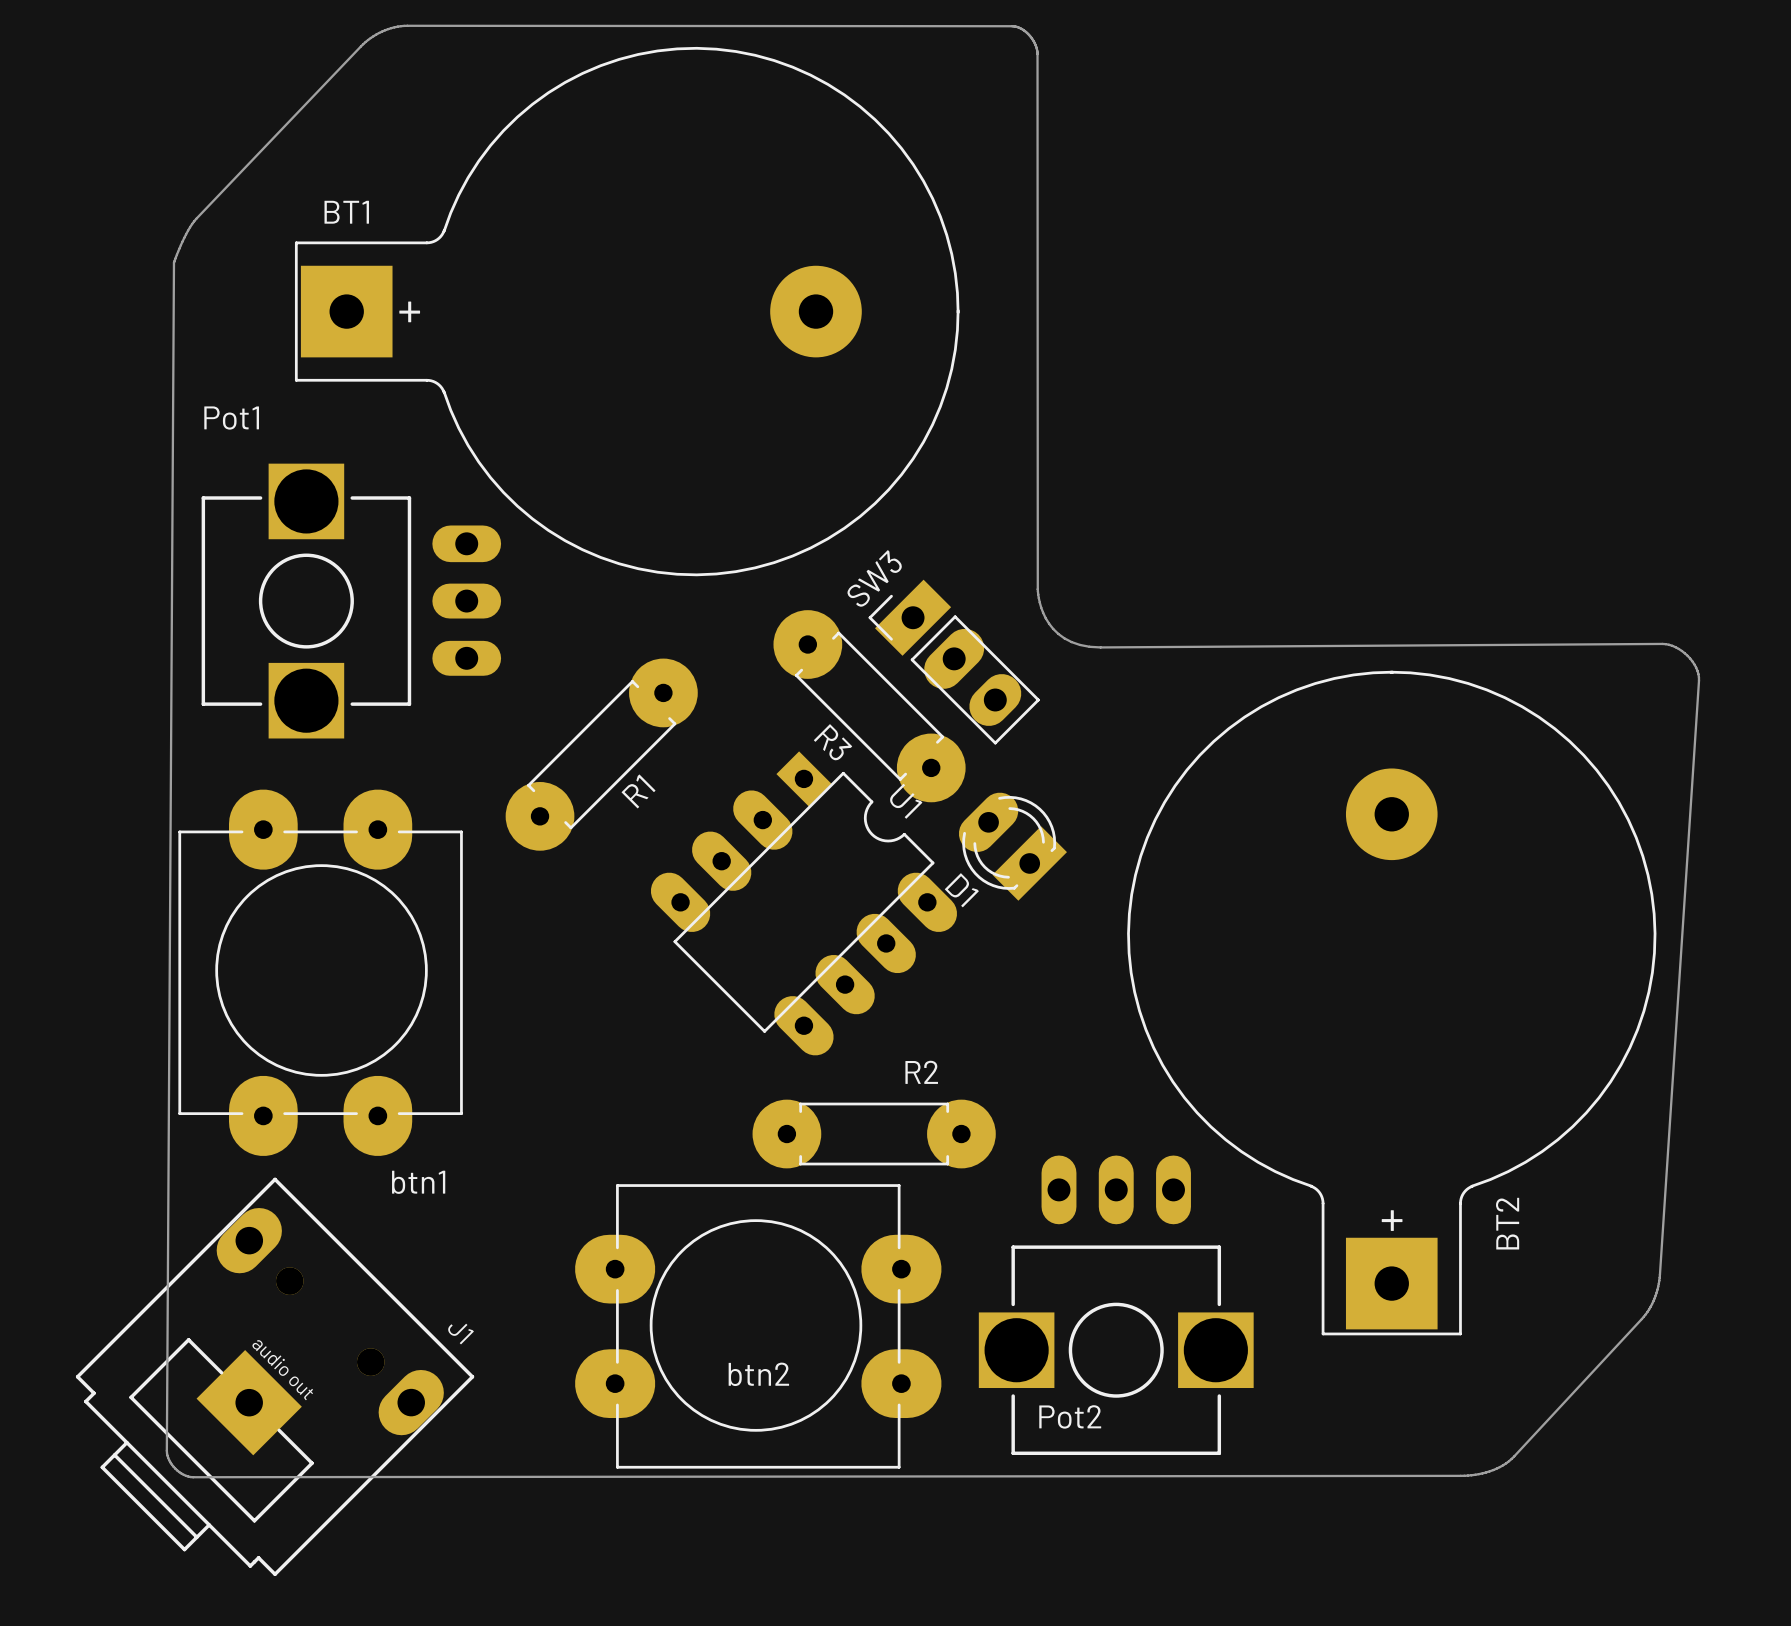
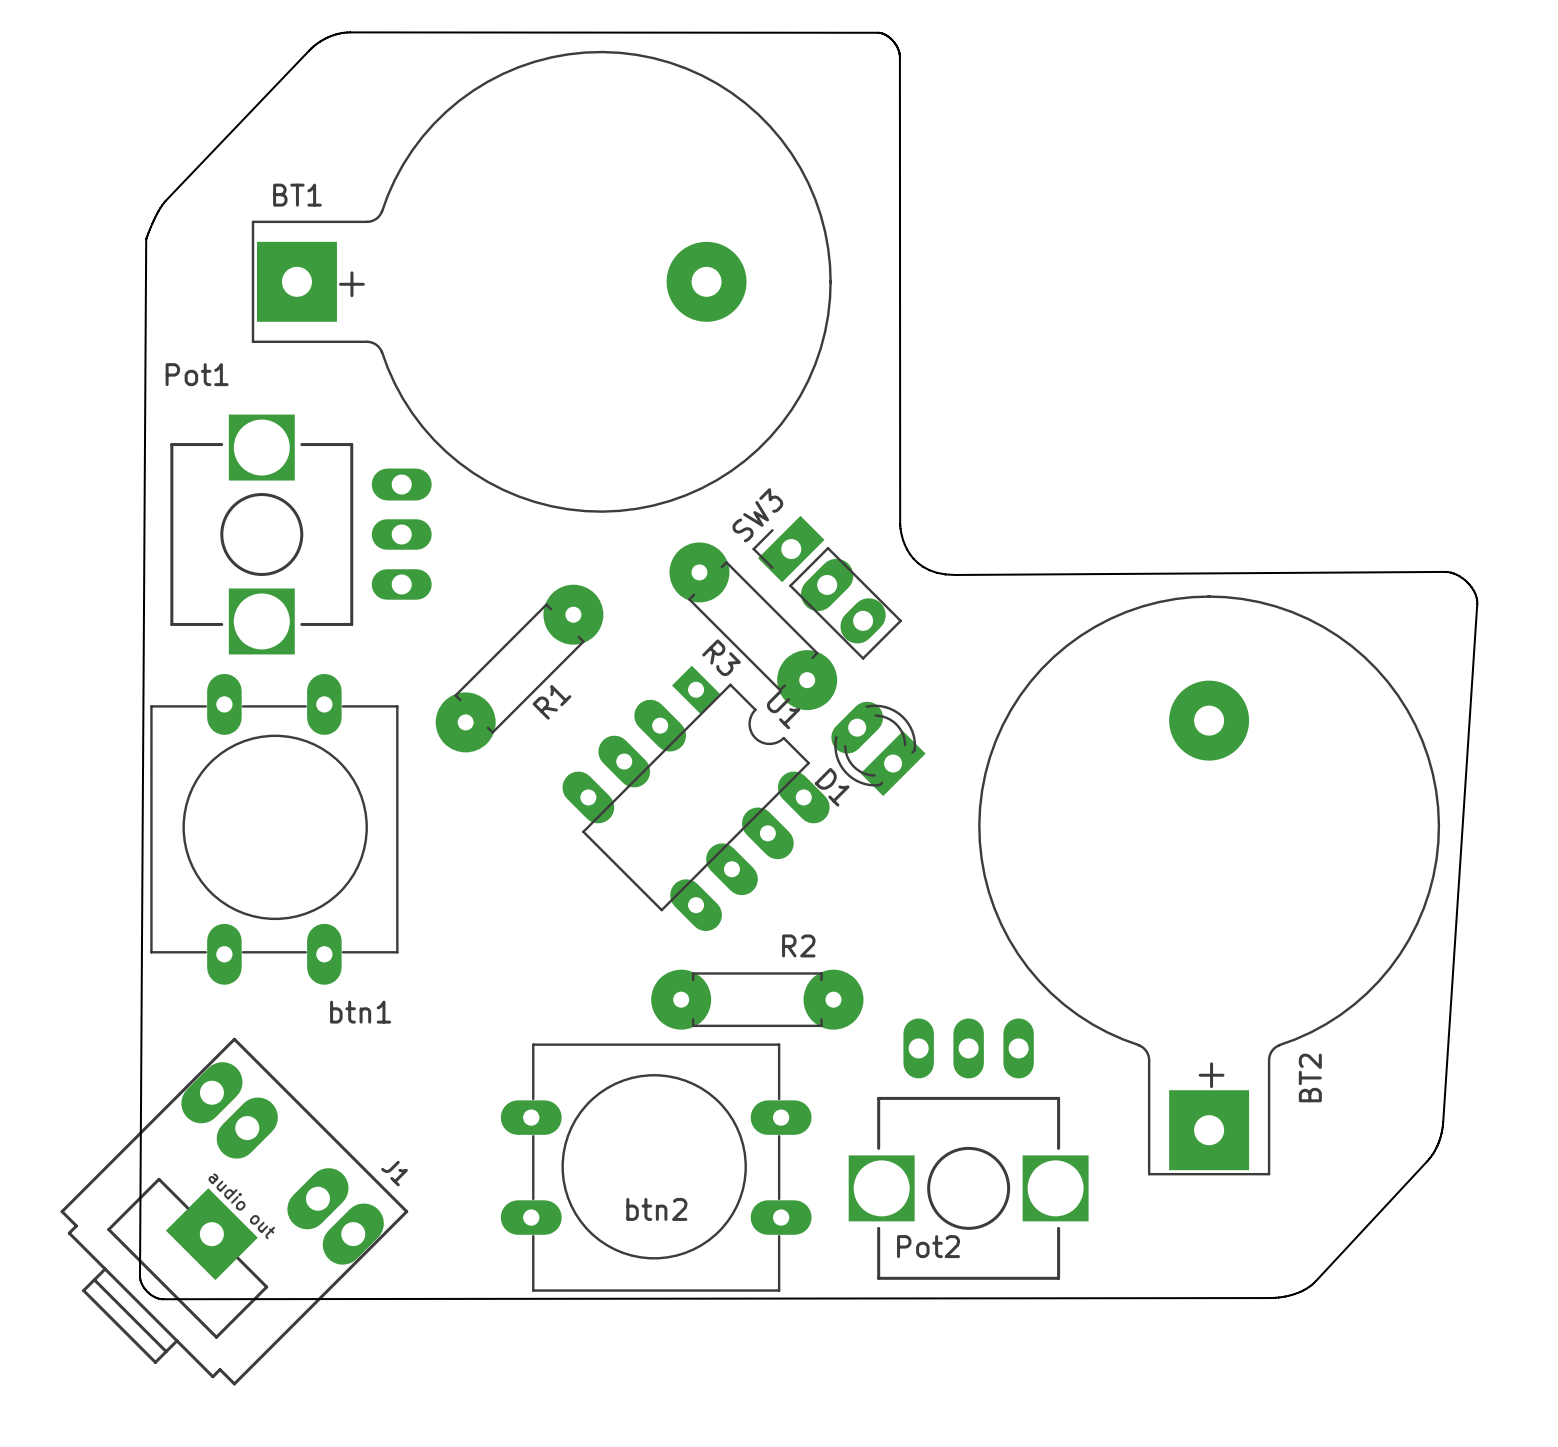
btn1 footprint: [178, 789, 463, 1157] -> [150, 673, 399, 985]
J1 footprint: [75, 1177, 475, 1577] -> [60, 1037, 409, 1386]
btn2 footprint: [575, 1184, 942, 1469] -> [500, 1043, 812, 1292]

